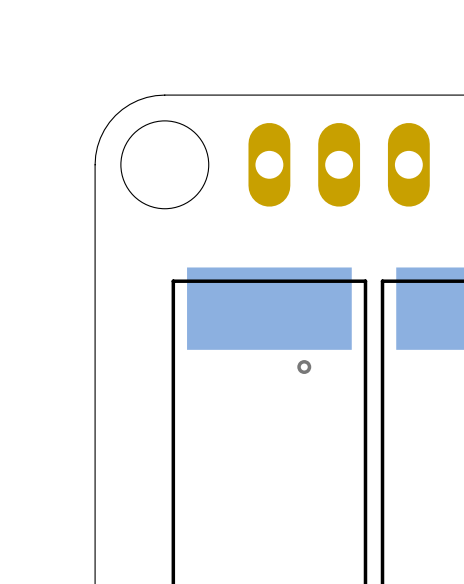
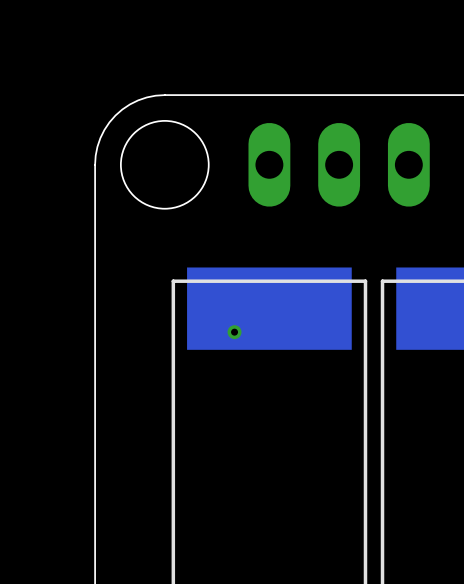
via position: (304, 367) -> (234, 332)

